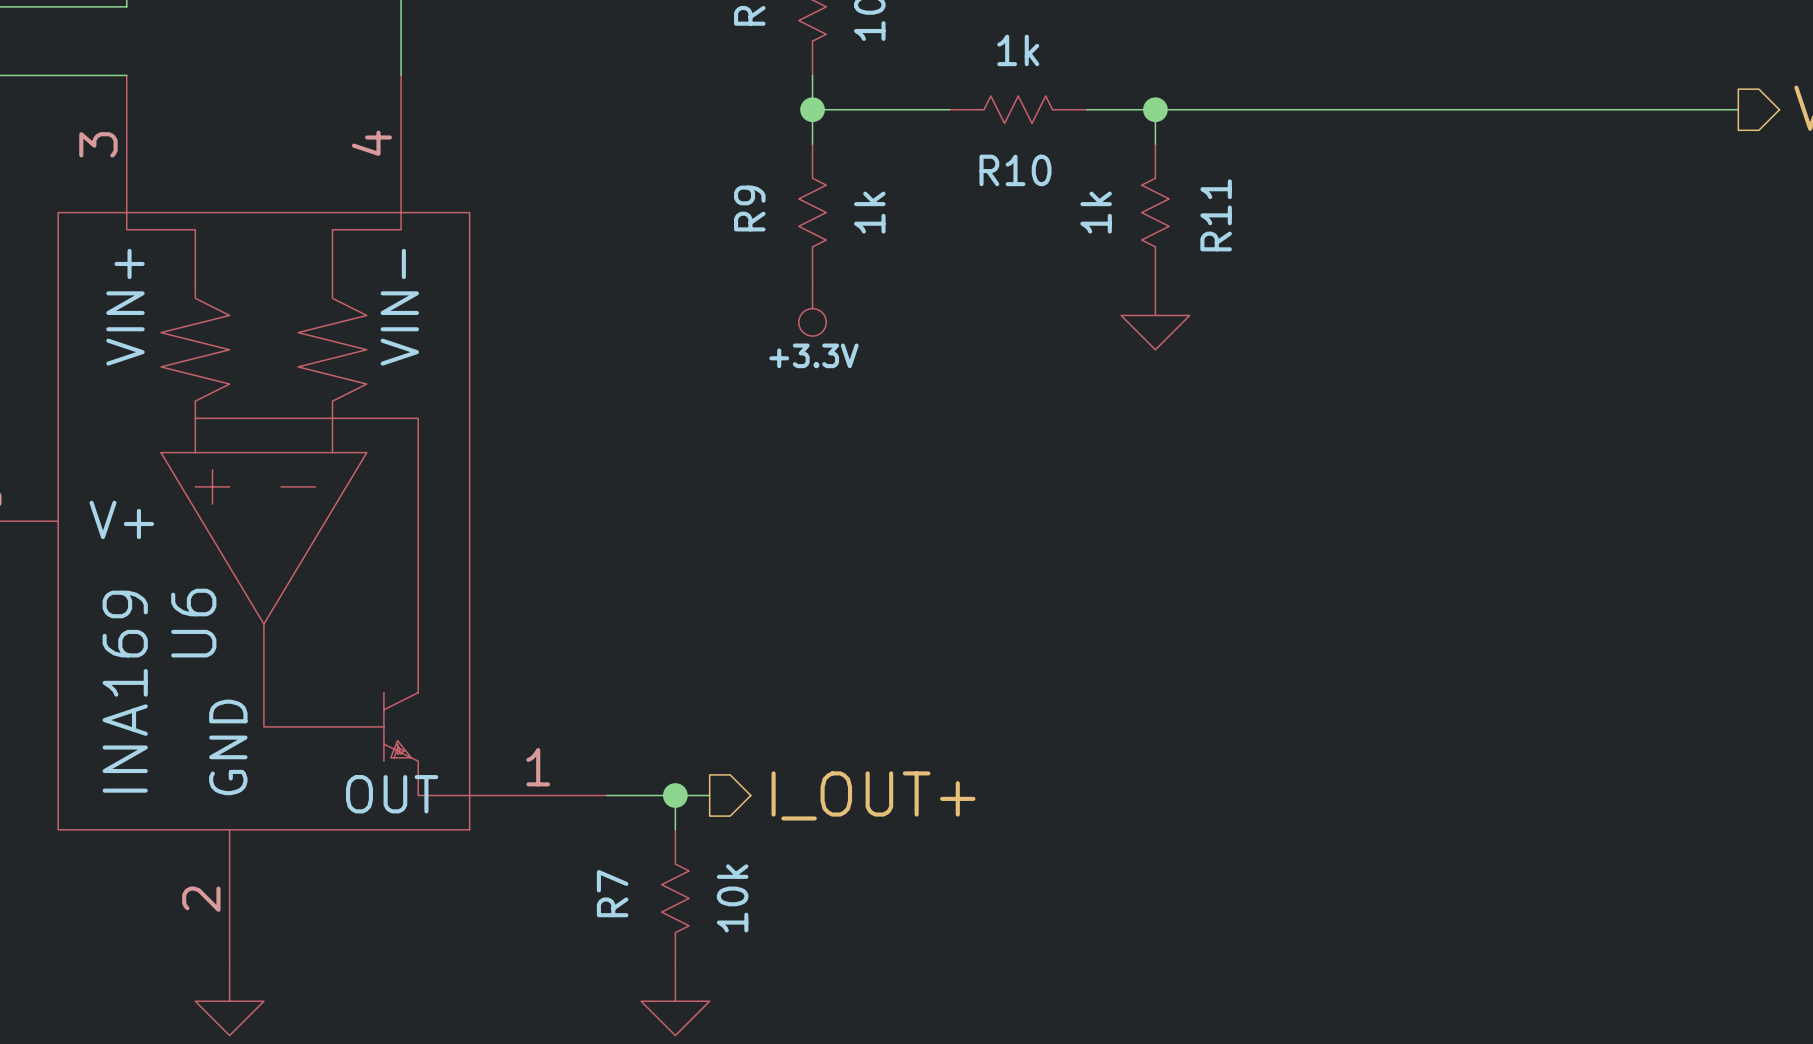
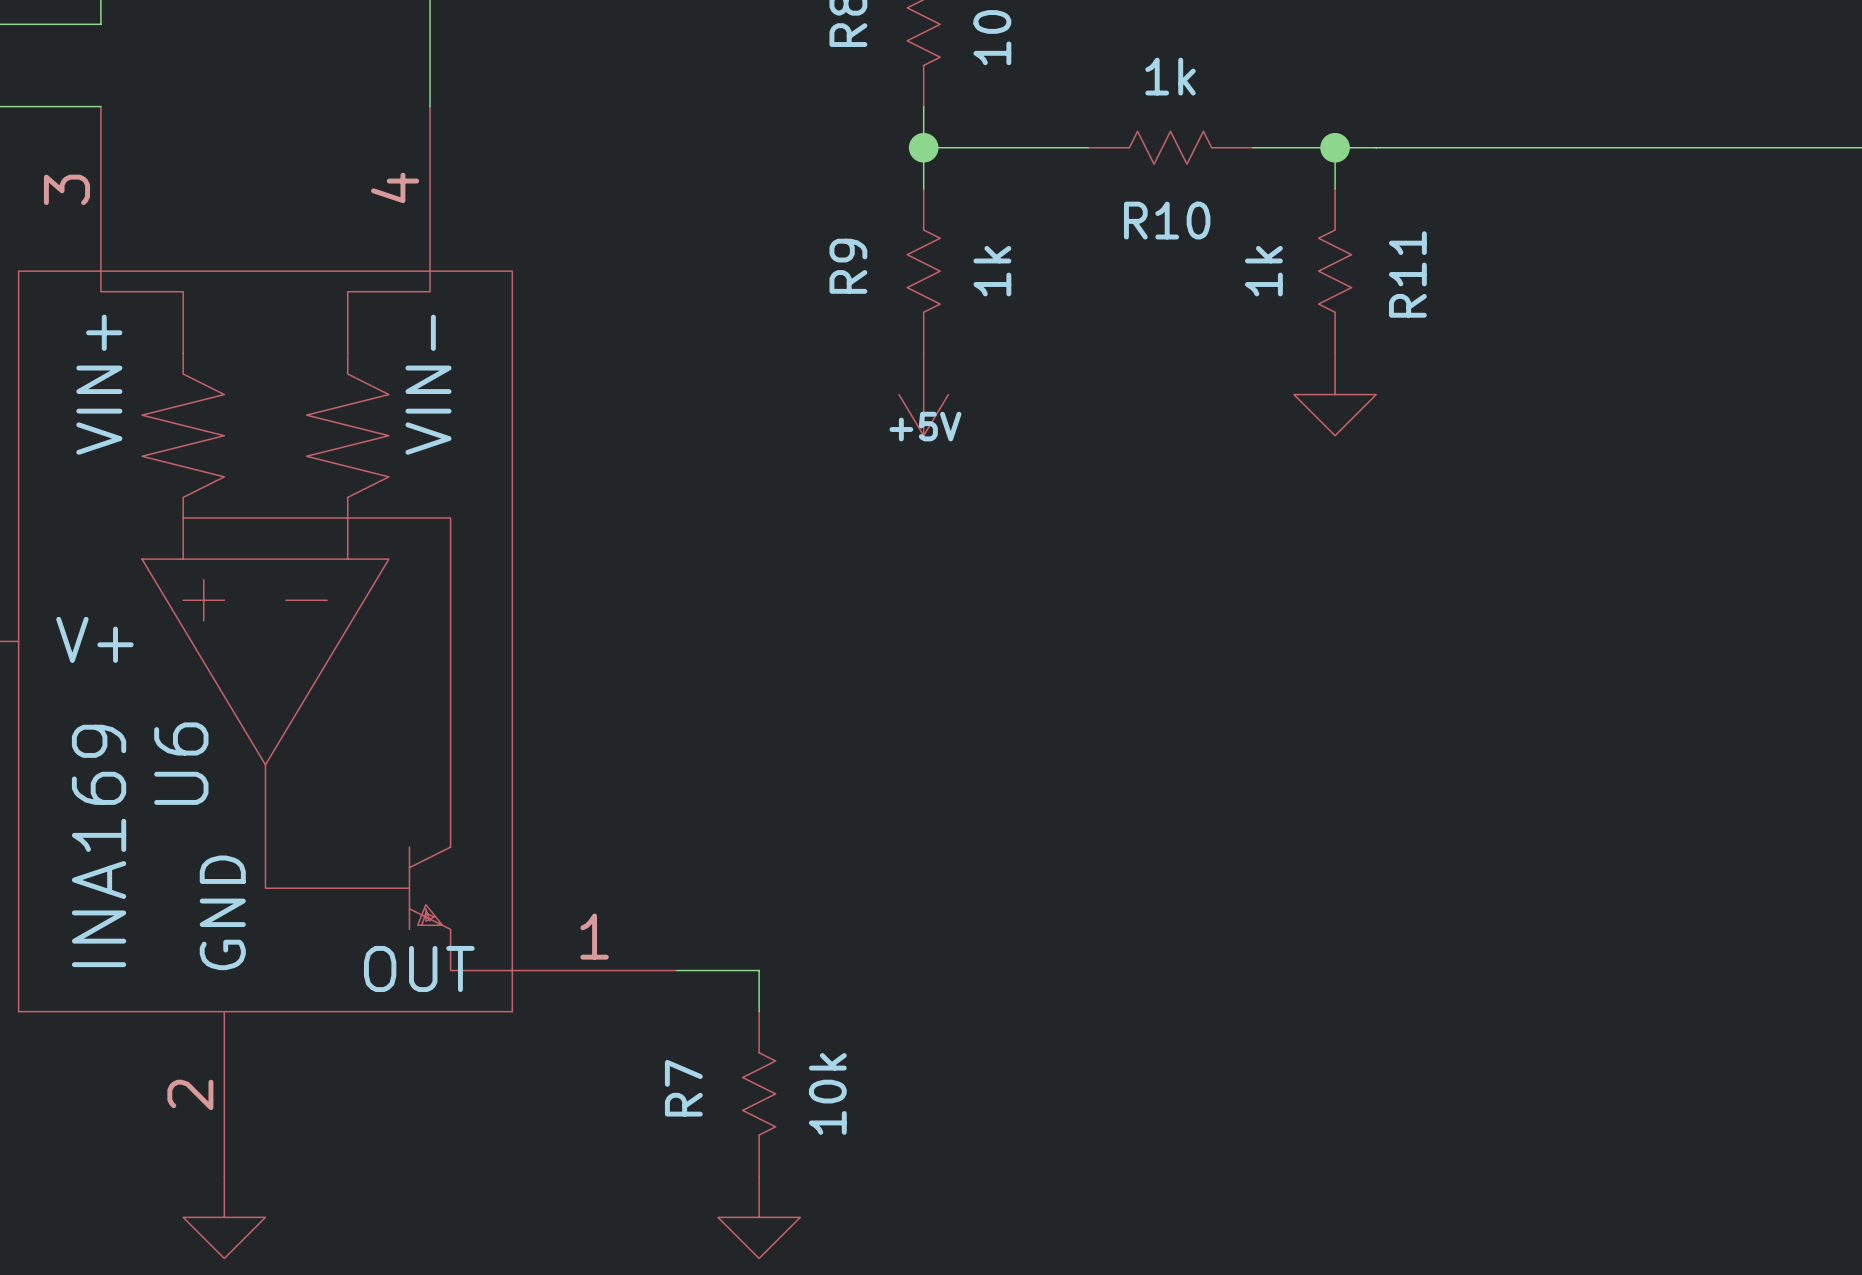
power symbol: +3.3V (812, 308) -> +5V (923, 394)
wire: (675, 795) (709, 795) -> none
junction: (675, 795) -> none
hierarchical label: I_OUT+ (873, 795) -> none

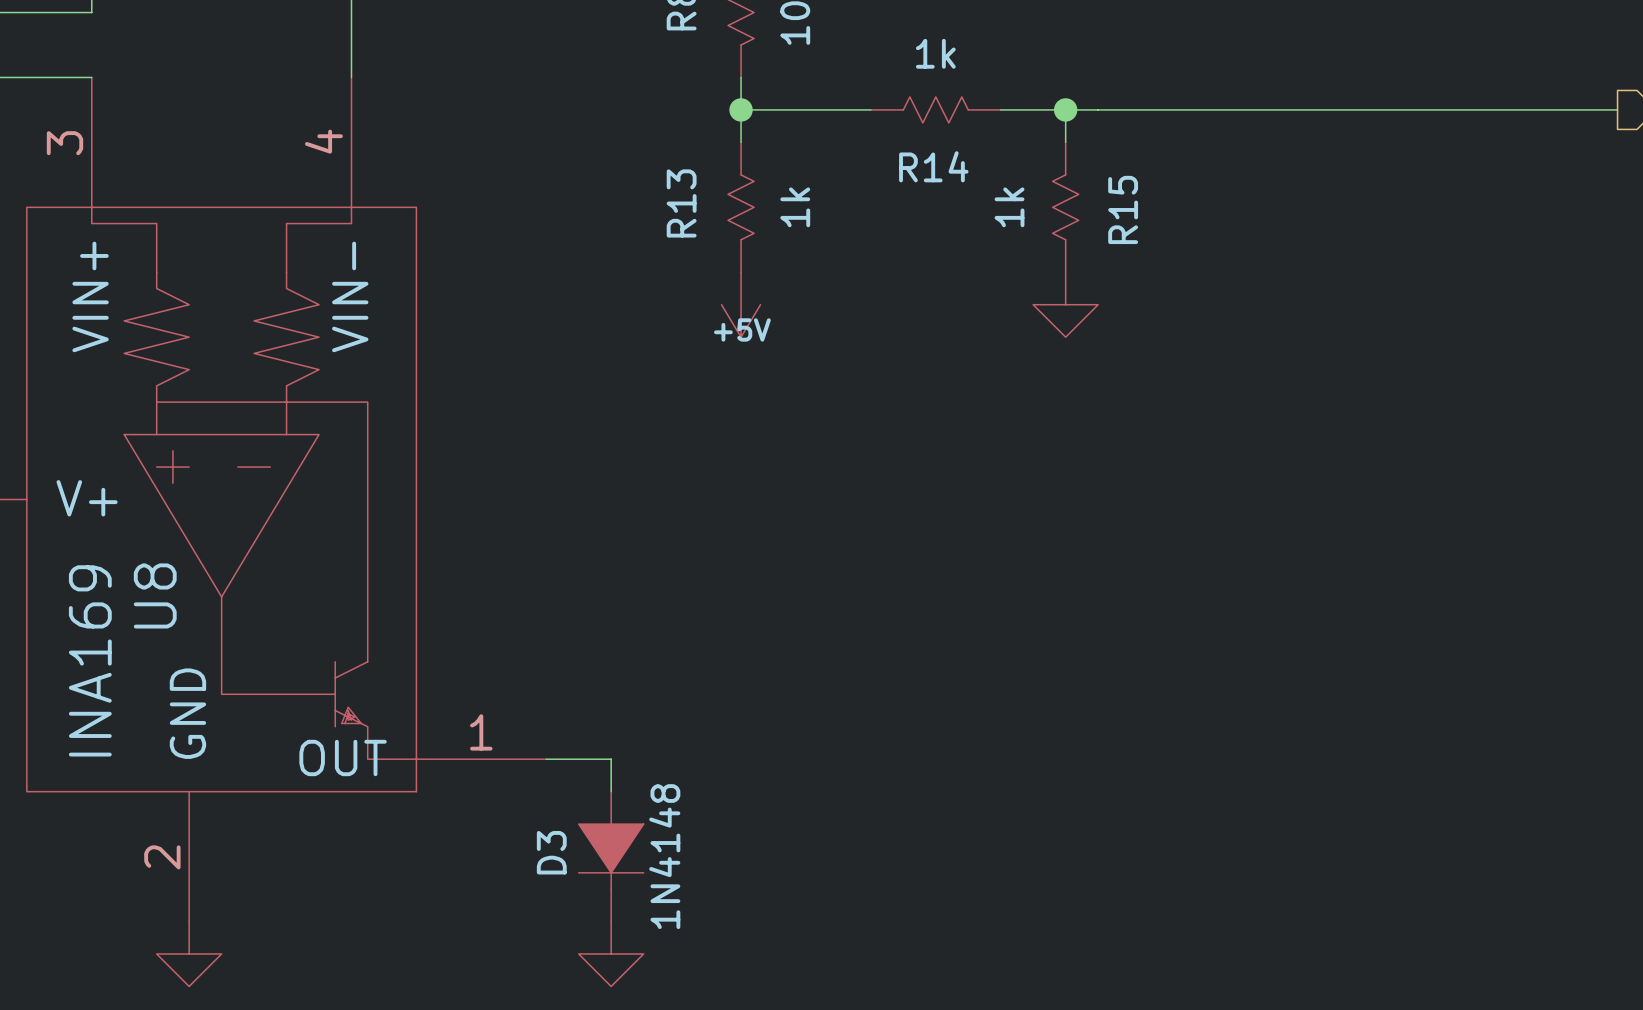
R10 name: R10 (1167, 220) -> R14 (933, 166)
R9 name: R9 (848, 266) -> R13 (681, 203)
R11 name: R11 (1407, 274) -> R15 (1123, 209)
U6 name: U6 (181, 763) -> U8 (155, 595)
R7: 10k (759, 1093) -> none
D3: none -> 1N4148 (611, 856)

